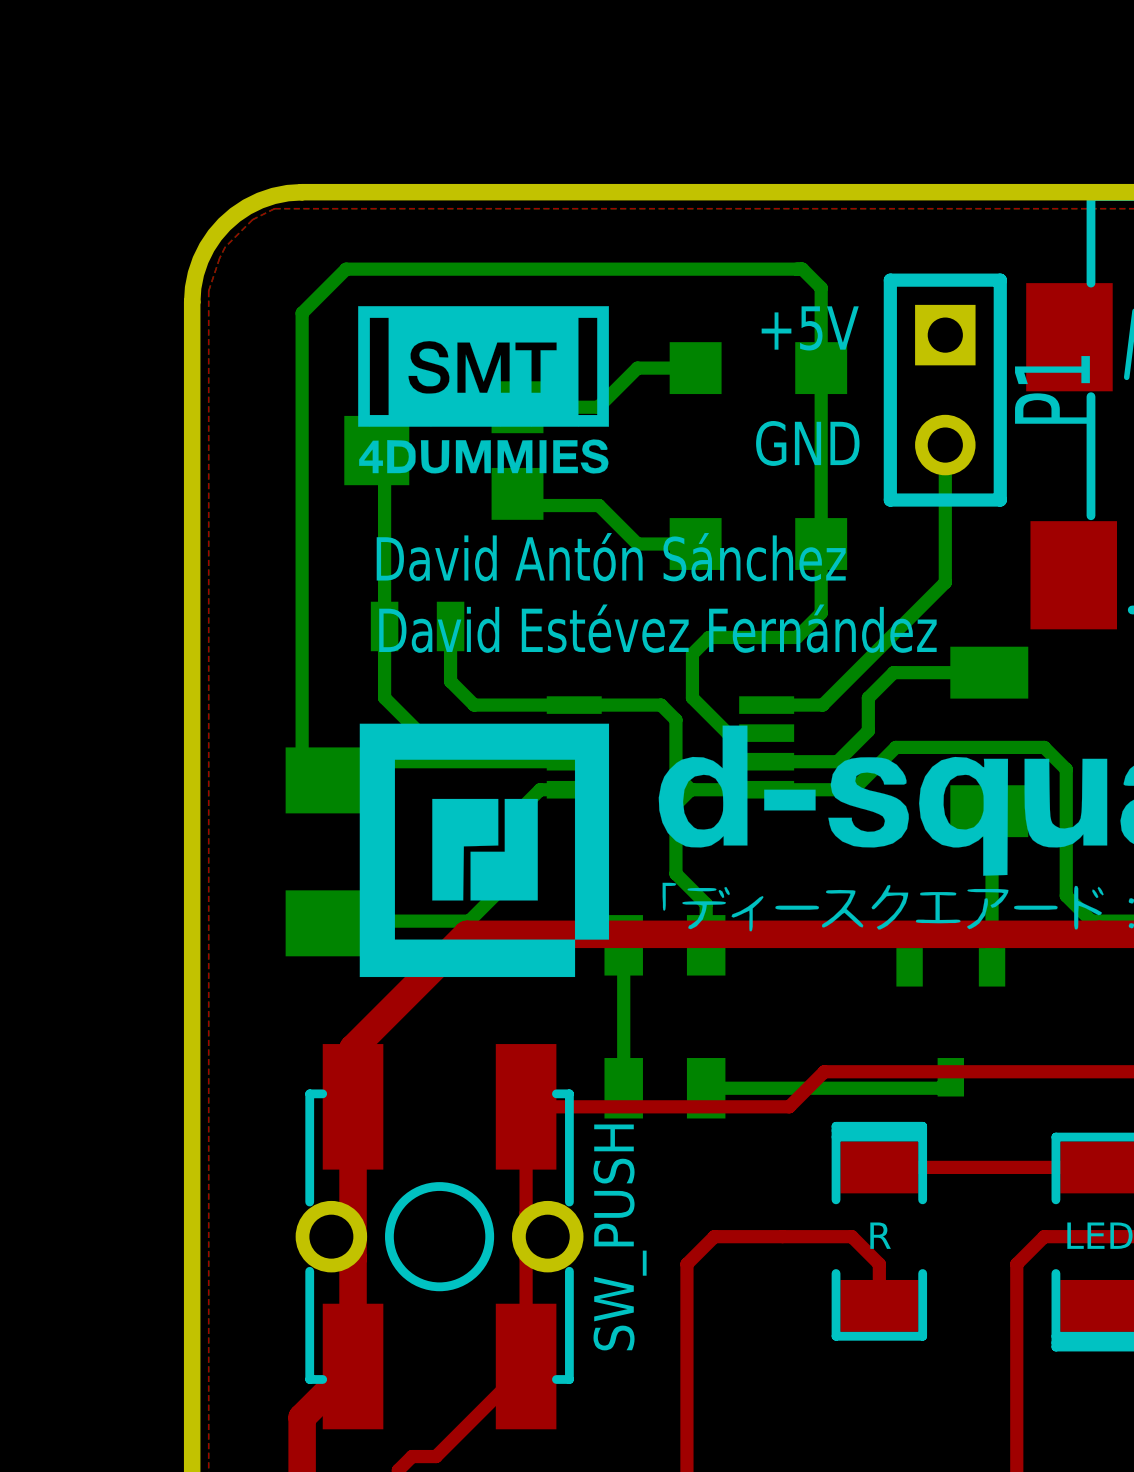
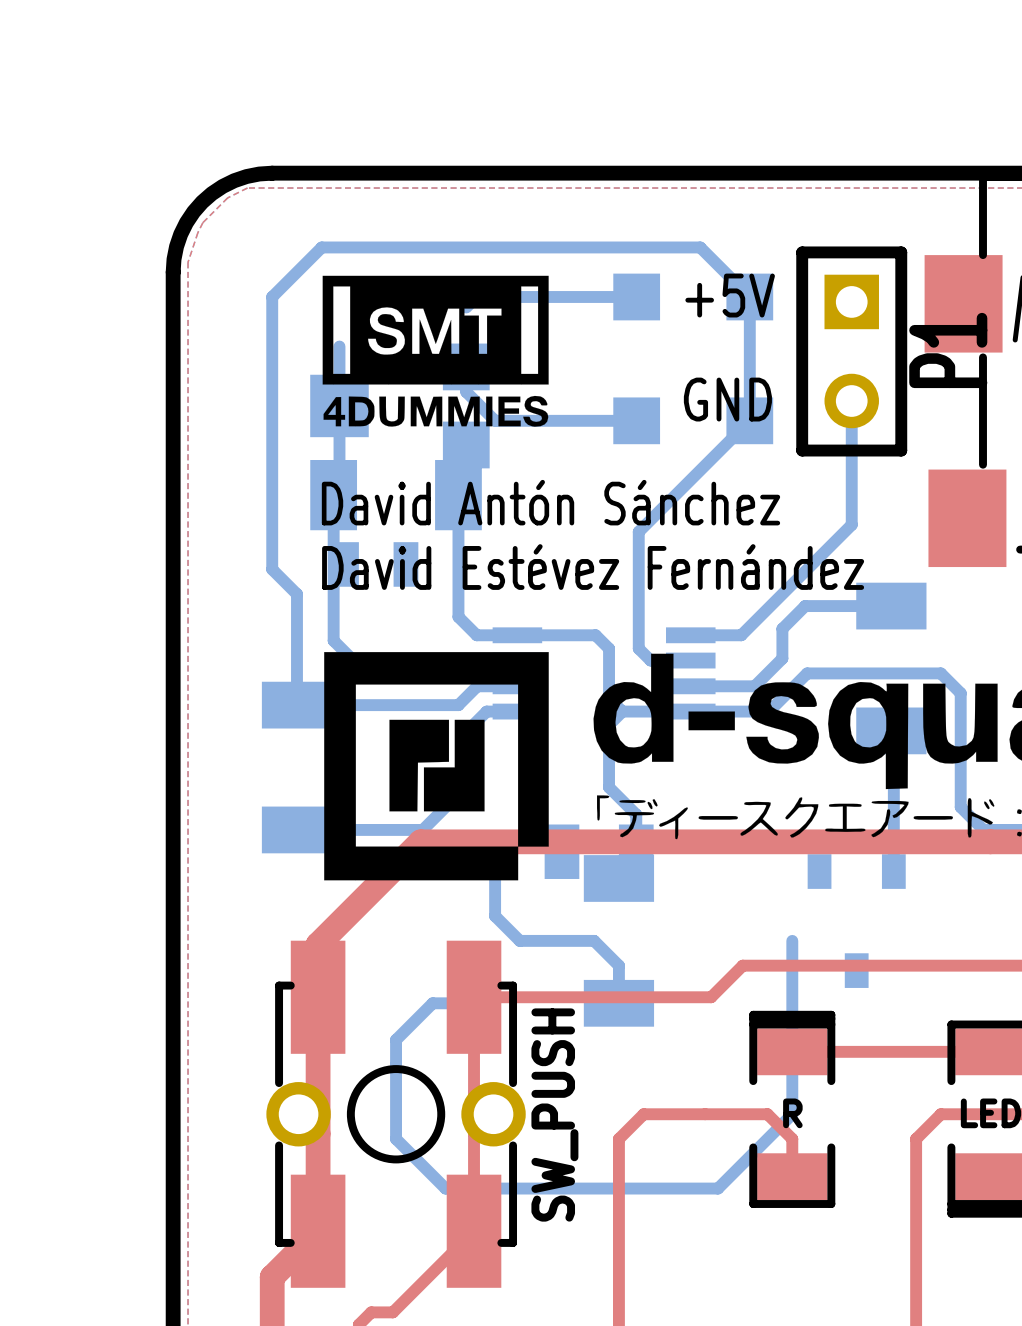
bottom track: (302, 329) (302, 313) (346, 269) (802, 269) (821, 287) (821, 613) (796, 637) (708, 637) (692, 653) (692, 697) (727, 733) -> (272, 296) (321, 247) (700, 247) (749, 296) (749, 420) (638, 531) (638, 648) (650, 660) (655, 660)
bottom track: none -> (636, 296) (476, 296) (466, 307)
bottom track: (695, 368) (637, 368) (598, 407) (517, 407) -> none
part position: (758, 368) -> (693, 296)
bottom track: none -> (466, 385) (466, 391) (495, 420) (636, 420)
bottom track: (376, 450) (384, 458) (384, 697) (419, 733) -> (339, 346) (339, 489) (333, 495) (333, 640) (353, 660) (378, 660)
bottom track: (517, 493) (529, 505) (598, 505) (637, 544) (695, 544) -> none
part position: (758, 544) -> (693, 420)
part: none -> (396, 495)
bottom track: (450, 626) (450, 681) (474, 705) (529, 705) -> (458, 495) (458, 616) (476, 635)
bottom track: (302, 631) (302, 752) (329, 780) (348, 761) (529, 761) -> (272, 569) (296, 594) (296, 705) (458, 705) (477, 686)
part footprint: [285, 747, 374, 957] -> [261, 681, 333, 854]
bottom track: (623, 945) (623, 1088) -> none
bottom track: none -> (495, 878) (495, 916) (519, 940) (594, 940) (618, 965) (618, 1003)
part: none -> (618, 940)
bottom track: none -> (792, 940) (792, 1114) (718, 1188) (445, 1188) (396, 1139) (396, 1039) (432, 1003) (495, 1003)
bottom track: (950, 1077) (939, 1088) (706, 1088) -> none
part: (664, 1088) -> none

